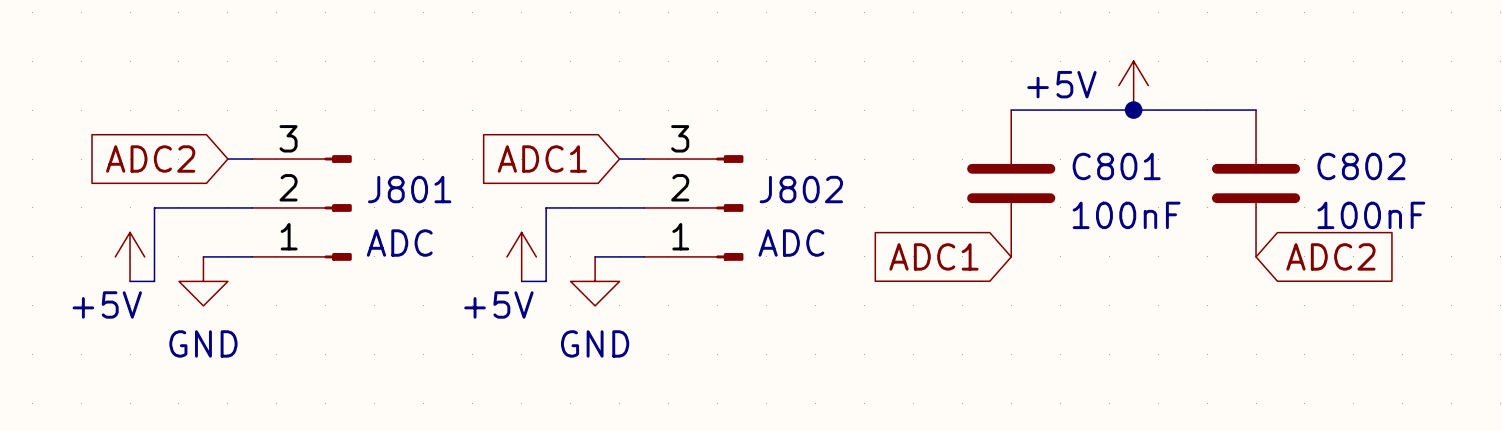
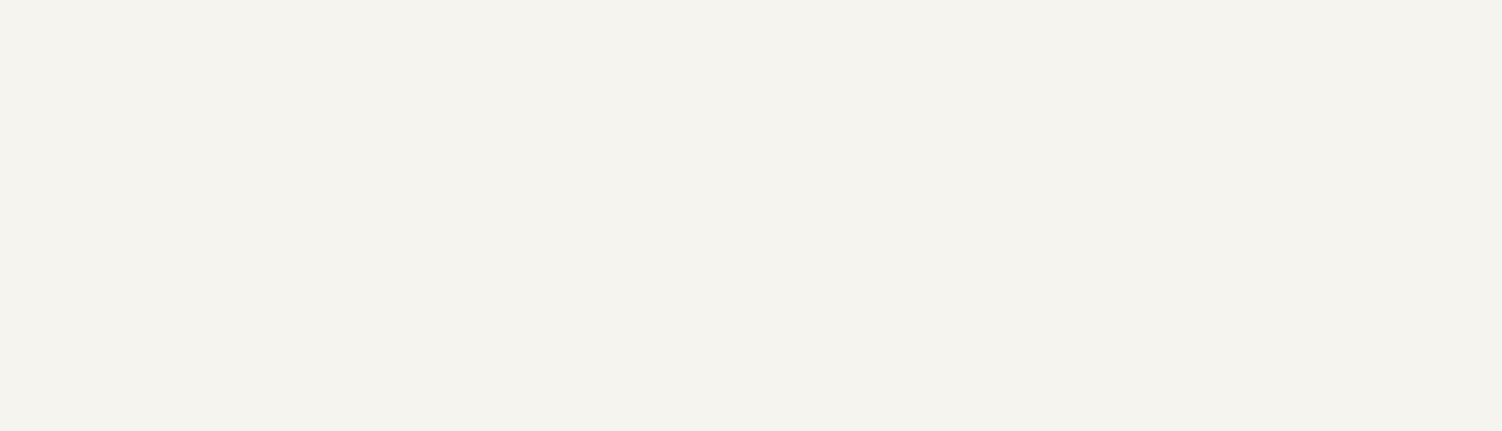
power symbol: +5V (1133, 85) -> none
wire: (1011, 110) (1256, 110) -> none
junction: (1133, 110) -> none
global label: ADC2 (150, 159) -> none
wire: (227, 159) (252, 159) -> none
global label: ADC1 (542, 159) -> none
wire: (619, 159) (644, 159) -> none
C801: 100nF (1011, 183) -> none
C802: 100nF (1256, 183) -> none
wire: (252, 207) (154, 207) (154, 281) (130, 281) -> none
J801: ADC (302, 207) -> none
wire: (644, 207) (546, 207) (546, 281) (521, 281) -> none
J802: ADC (693, 207) -> none
power symbol: +5V (130, 256) -> none
wire: (203, 256) (252, 256) -> none
power symbol: +5V (521, 256) -> none
wire: (595, 256) (644, 256) -> none
global label: ADC1 (933, 256) -> none
global label: ADC2 (1330, 256) -> none
power symbol: GND (203, 281) -> none
power symbol: GND (595, 281) -> none

